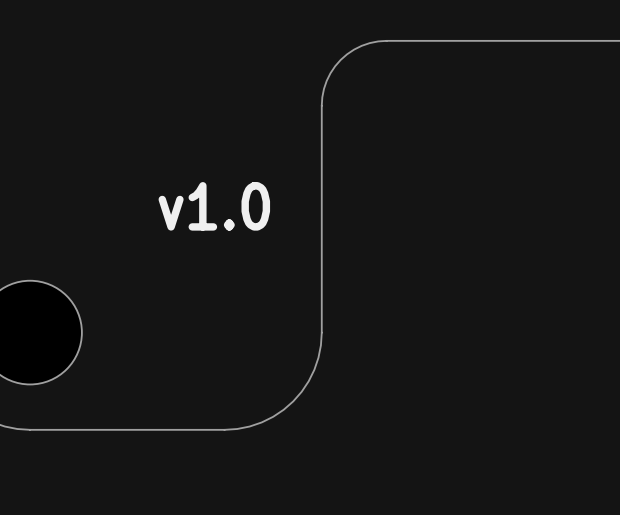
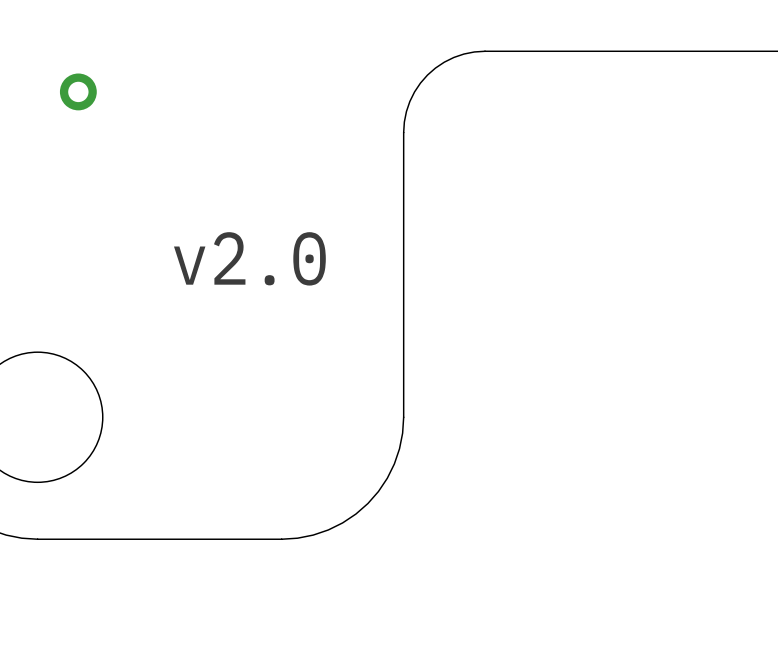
via: none -> (78, 91)
text: v1.0 (214, 206) -> v2.0 (249, 258)

